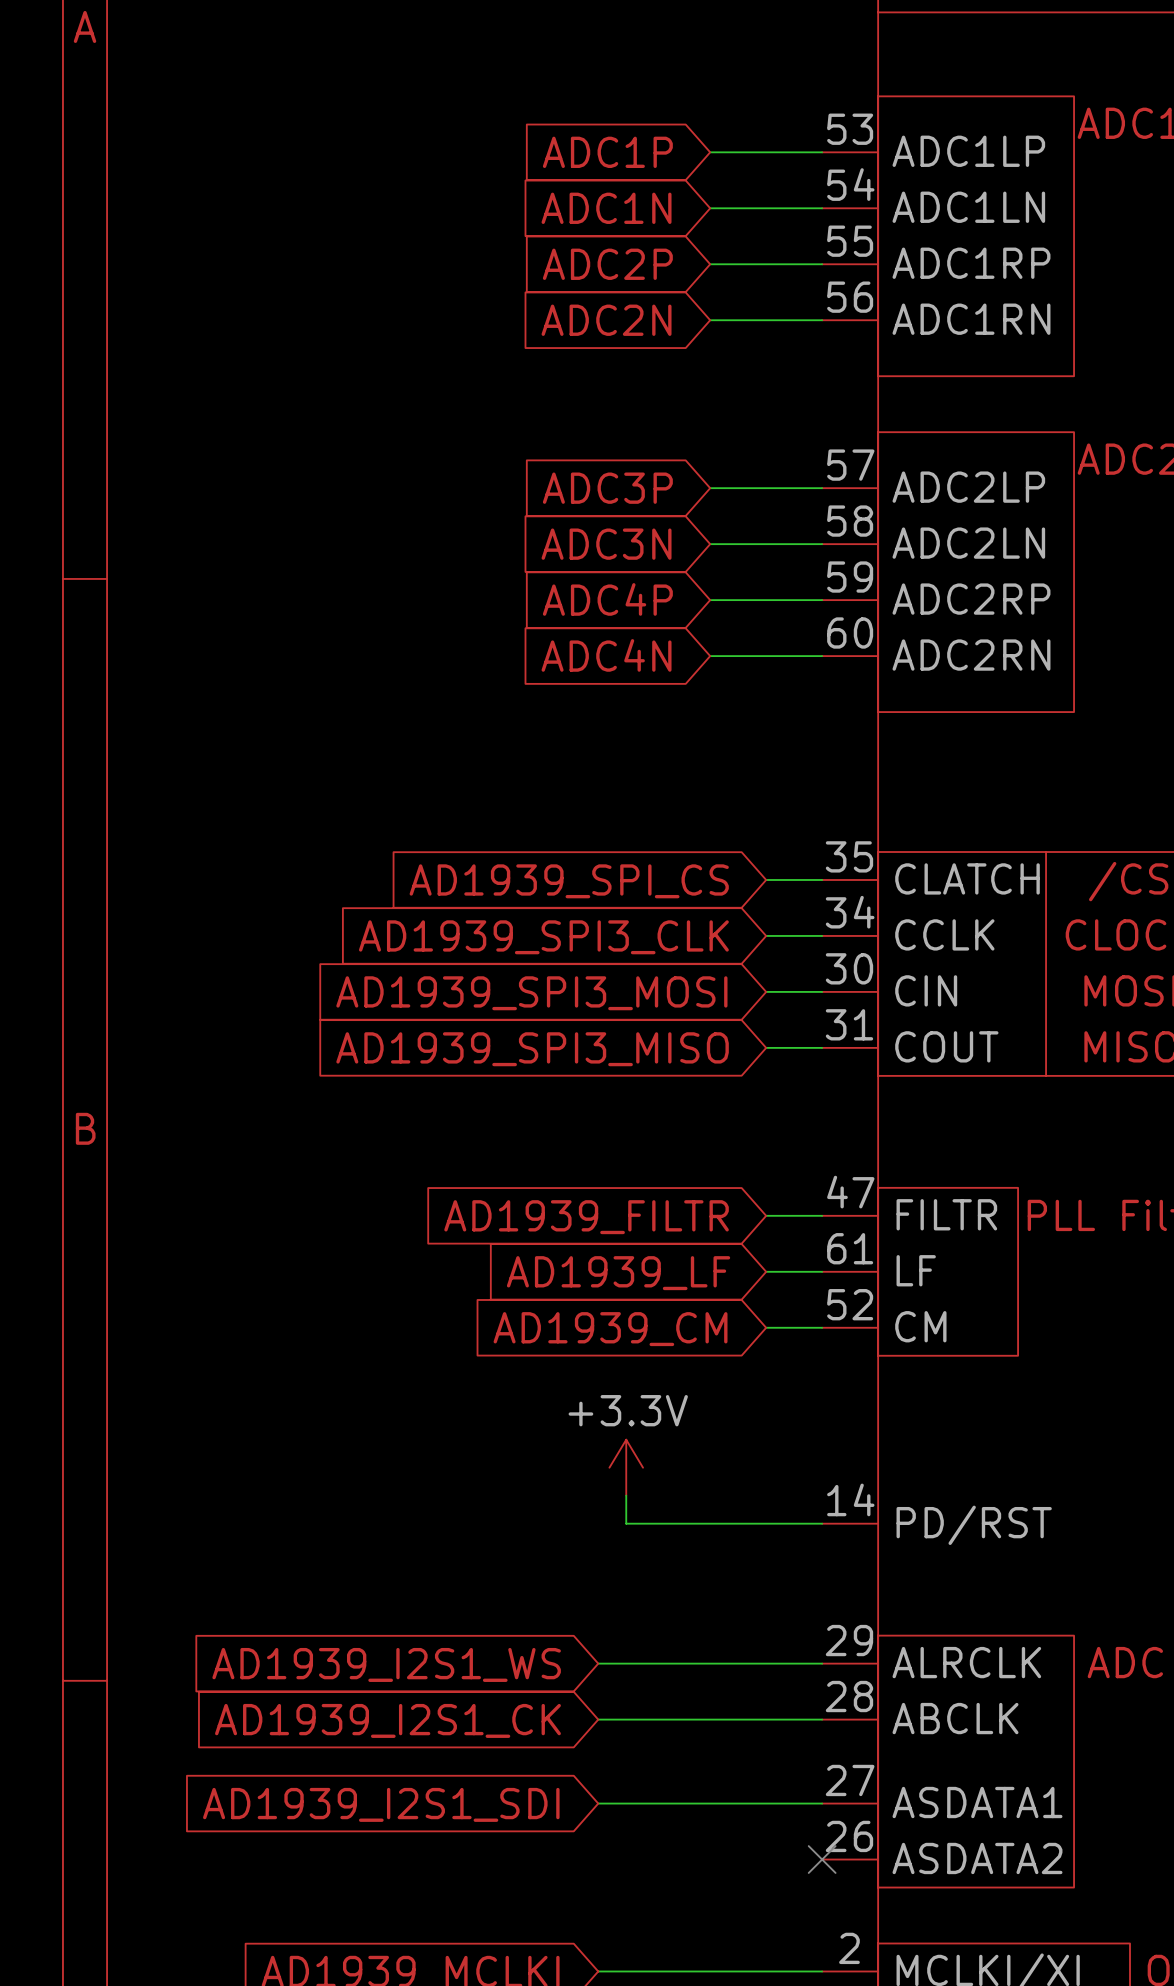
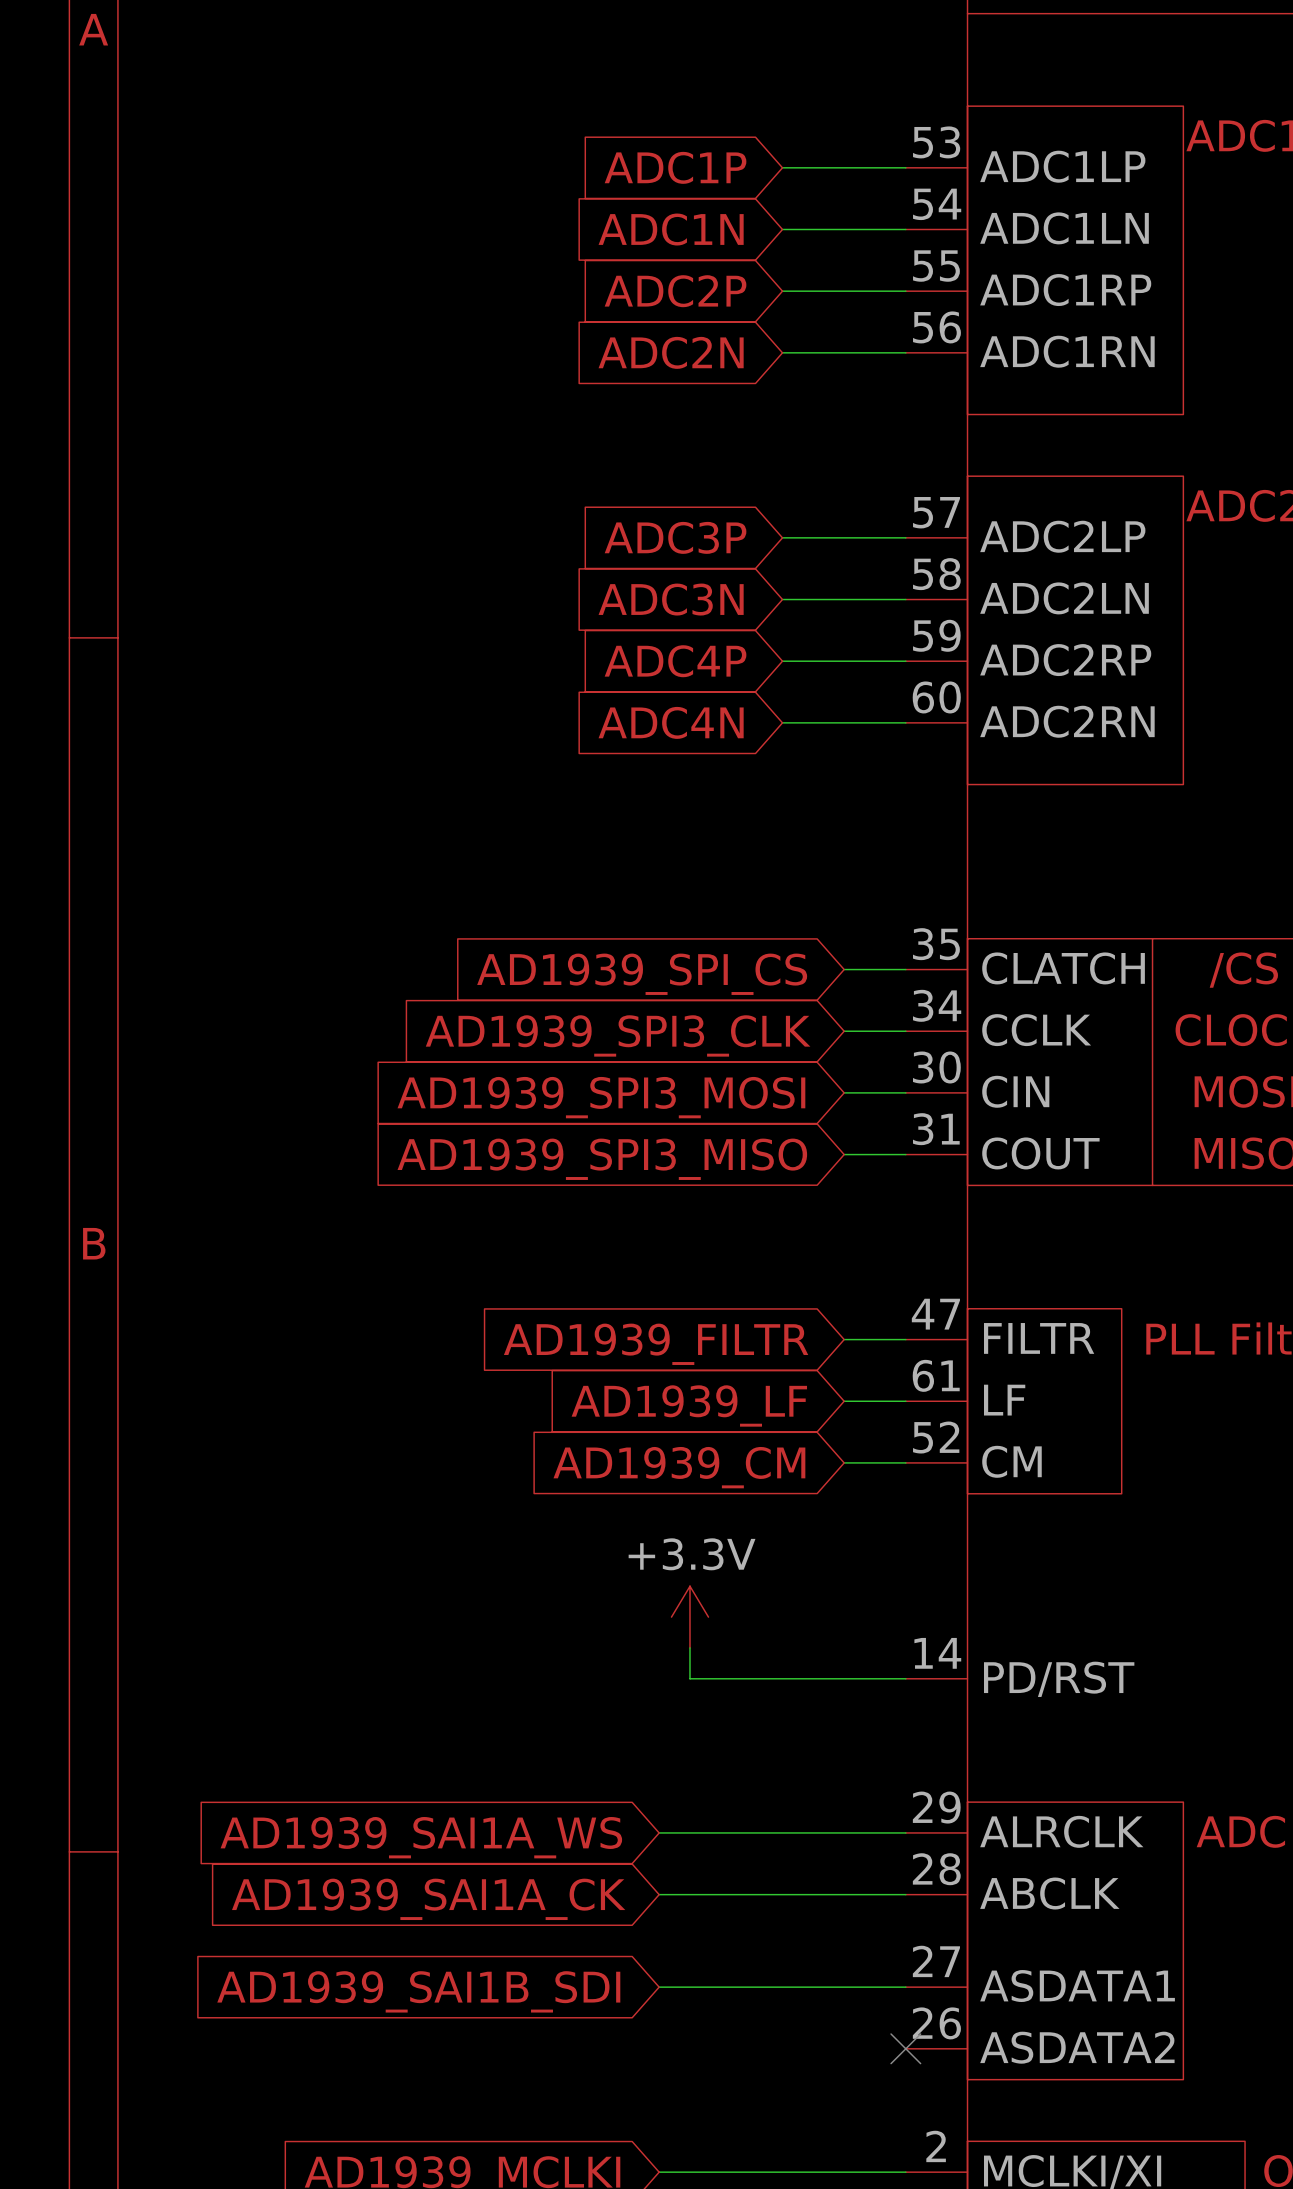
global label: AD1939_I2S1_WS (386, 1664) -> AD1939_SAI1A_WS (421, 1837)
global label: AD1939_I2S1_CK (387, 1720) -> AD1939_SAI1A_CK (428, 1899)
global label: AD1939_I2S1_SDI (381, 1804) -> AD1939_SAI1B_SDI (418, 1991)

